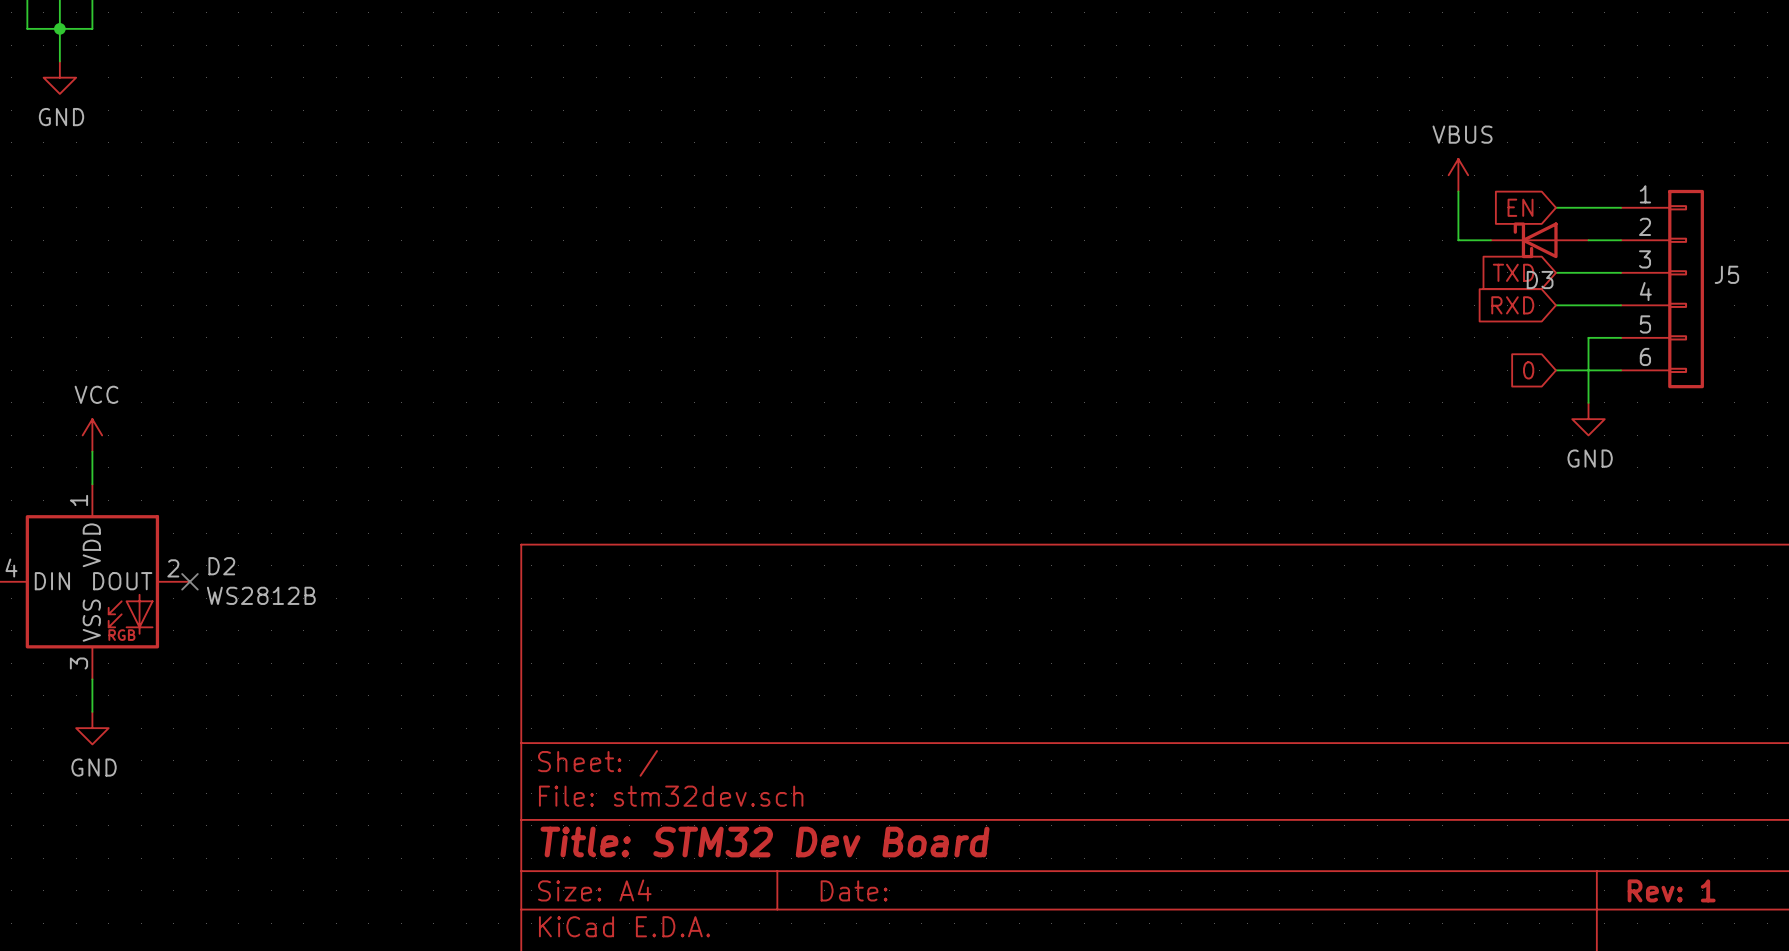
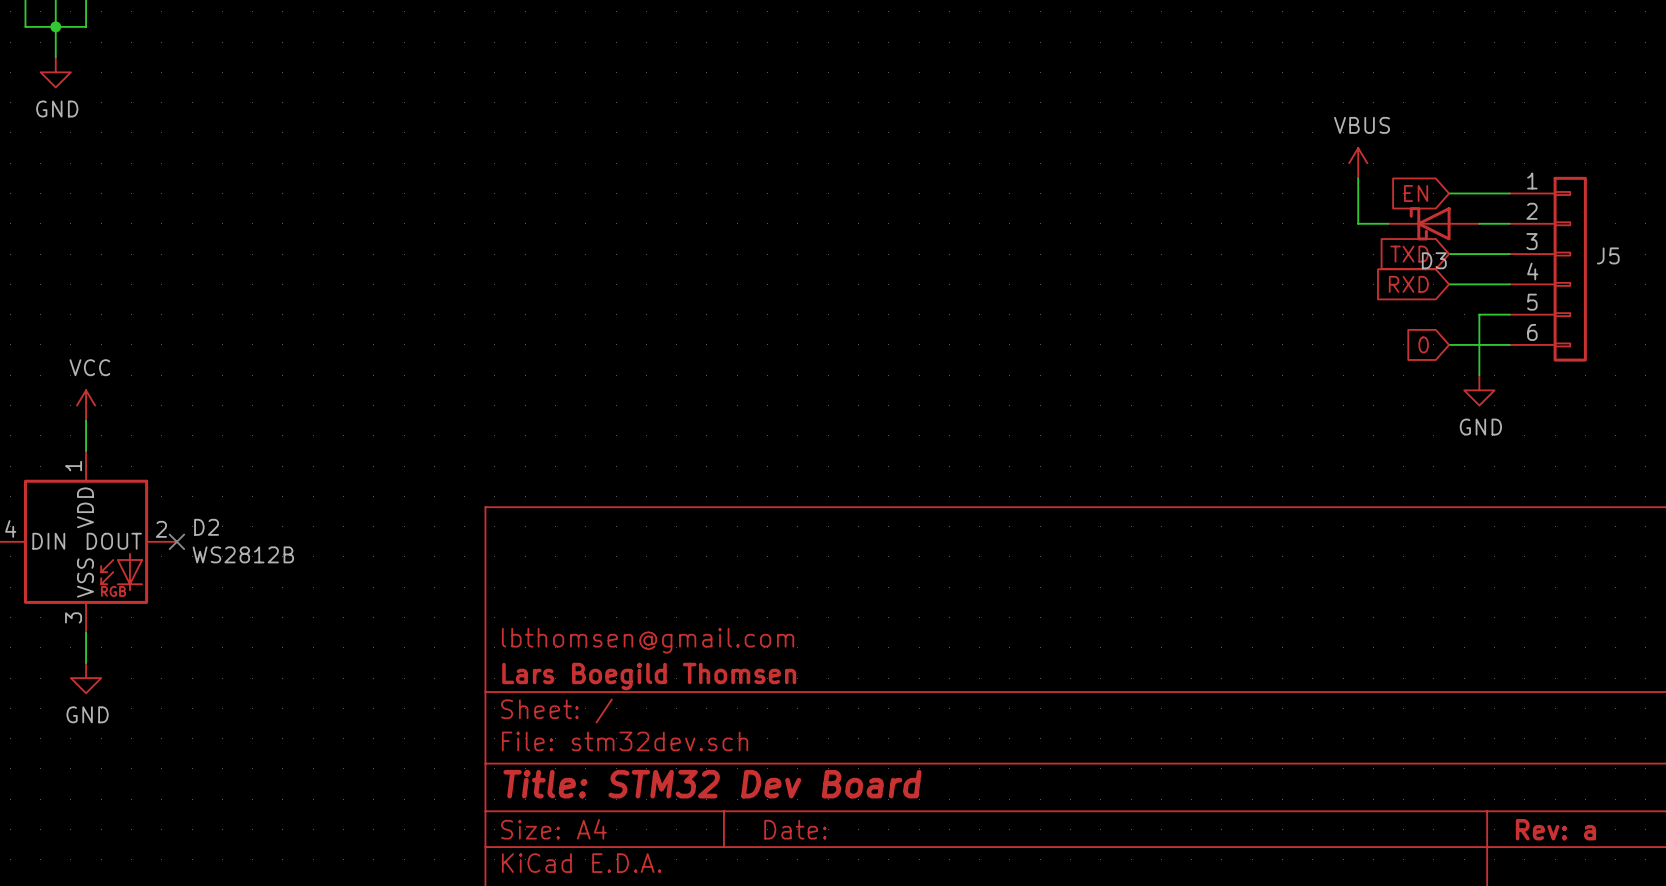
title block: none -> lbthomsen@gmail.com (648, 640)
title block: none -> Lars Boegild Thomsen (649, 676)
title block: Rev: 1 (1671, 890) -> Rev: a (1555, 829)

